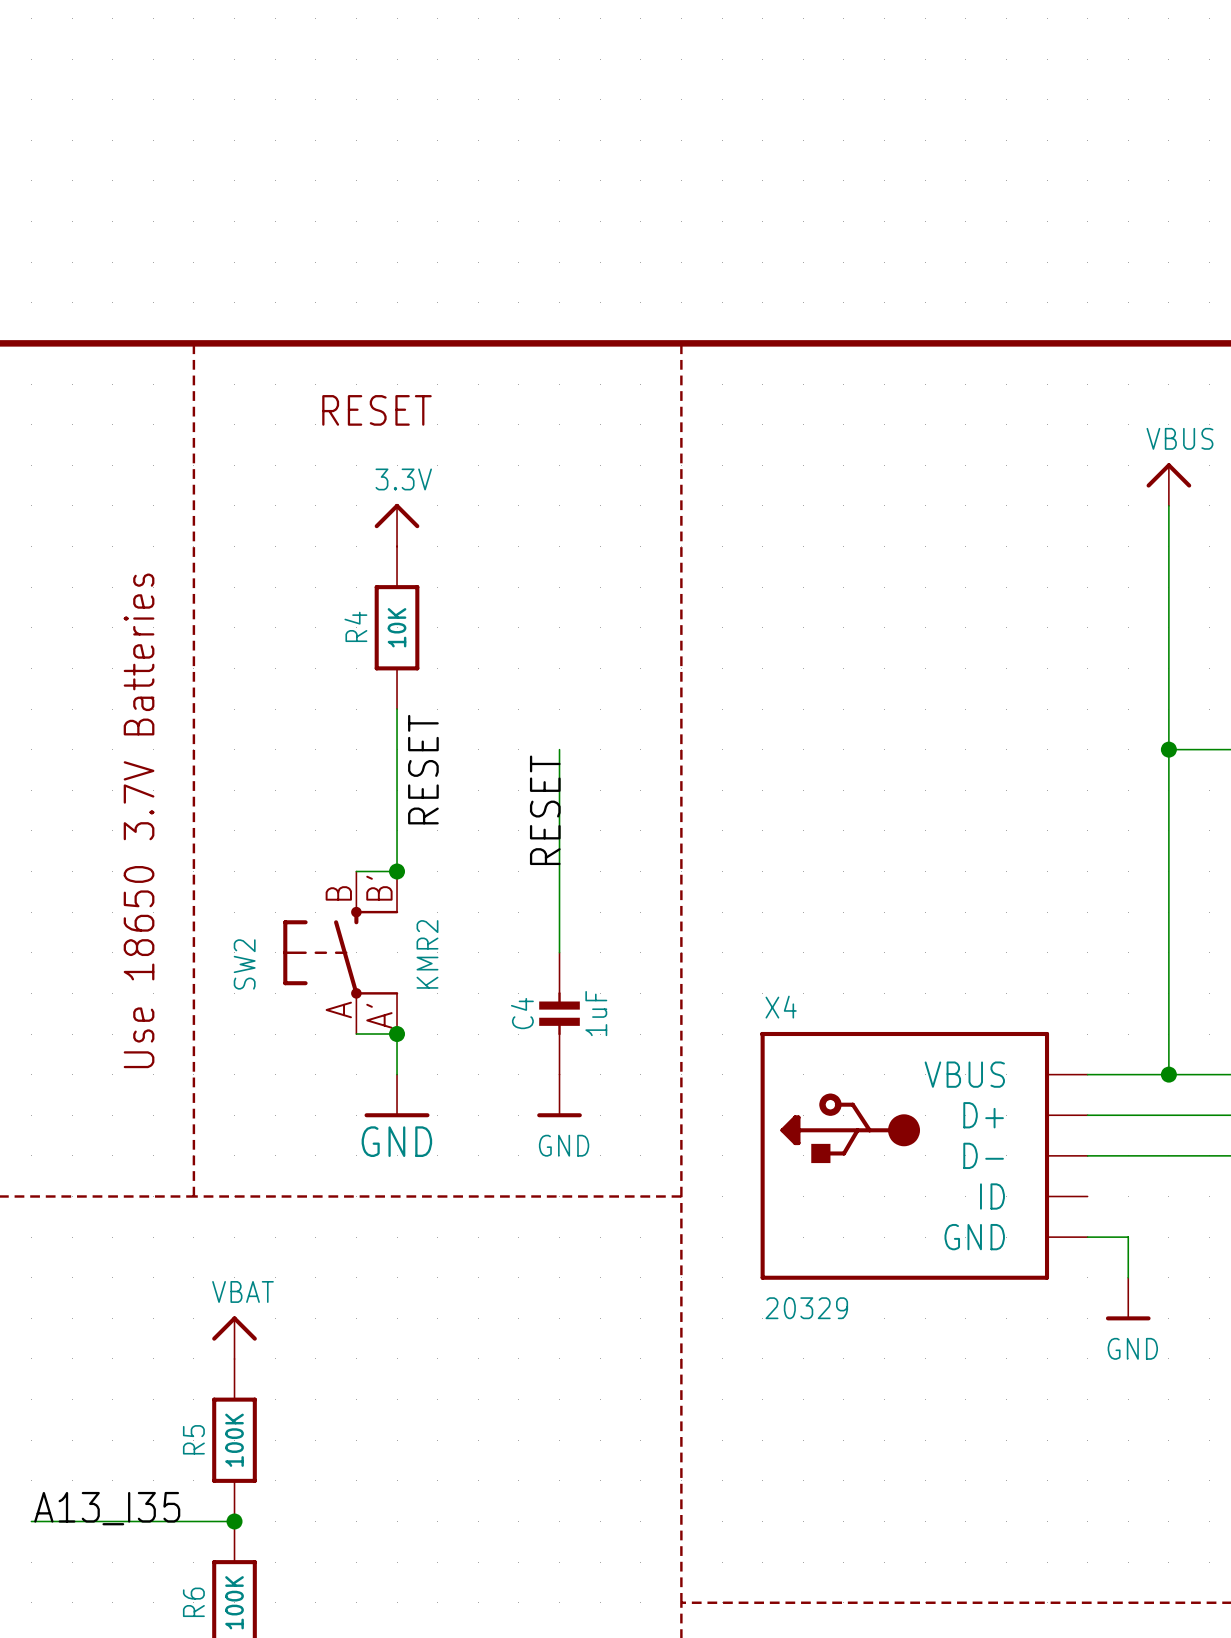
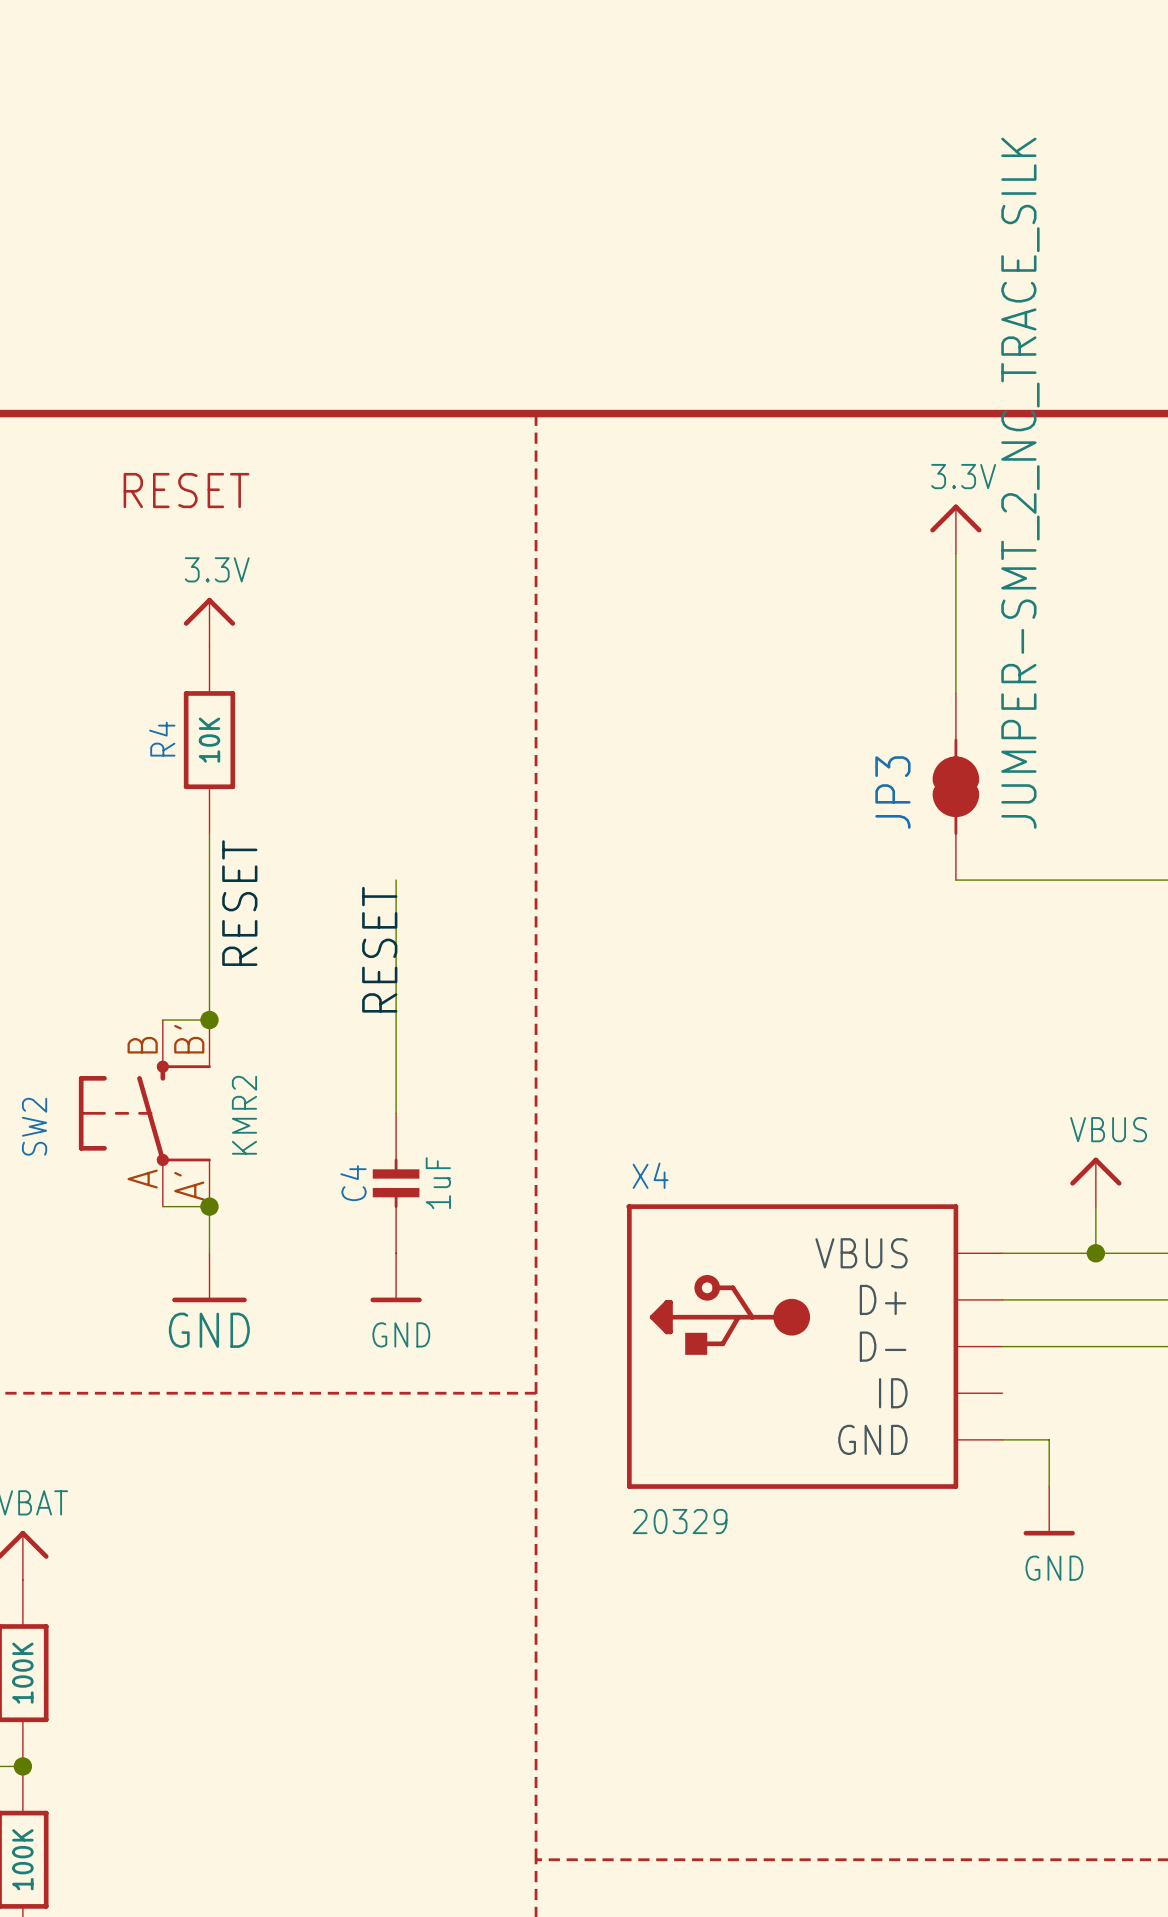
power symbol: none -> 3.3V (955, 529)
wire: none -> (955, 553) (955, 693)
power symbol: VBUS (1168, 484) -> none
wire: (1168, 505) (1168, 1034) -> none
JP3: none -> JUMPER-SMT_2_NC_TRACE_SILK (955, 786)
wire: none -> (955, 880) (1095, 880)
junction: (1168, 749) -> none
power symbol: none -> VBUS (1095, 1182)

